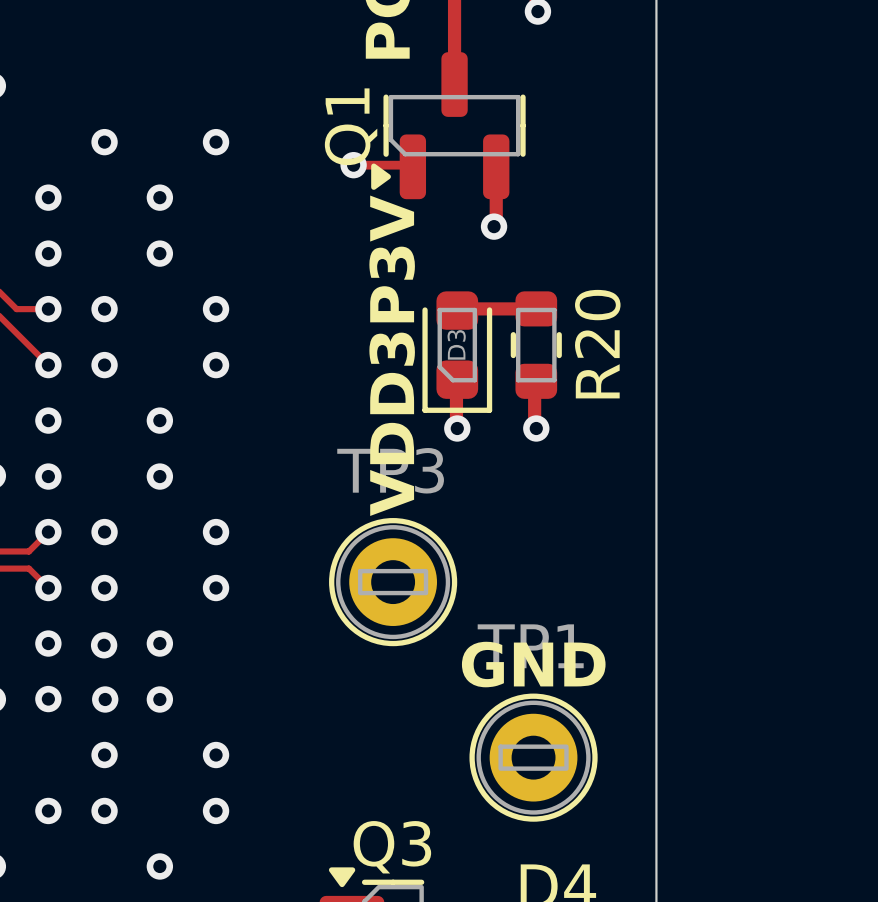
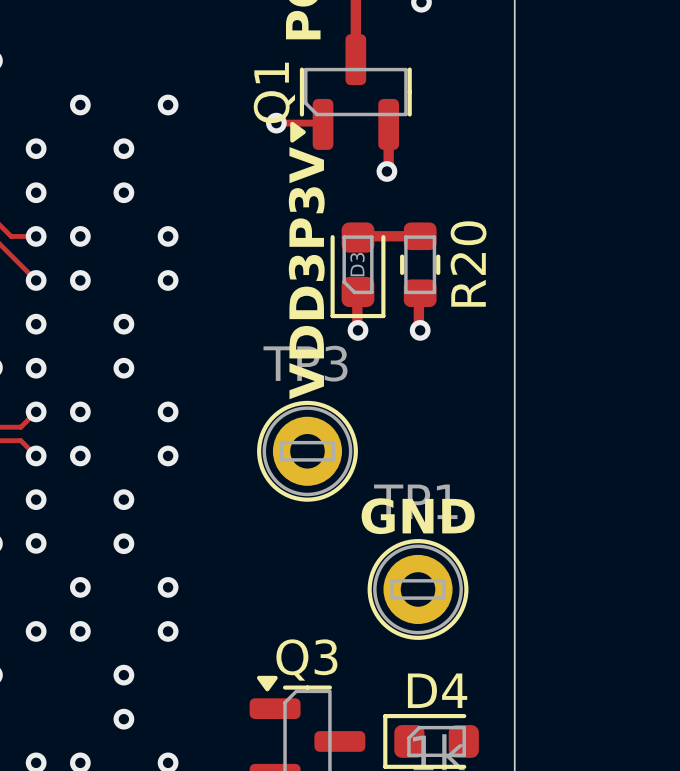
via: (104, 645) -> none
via: (105, 699) -> none

